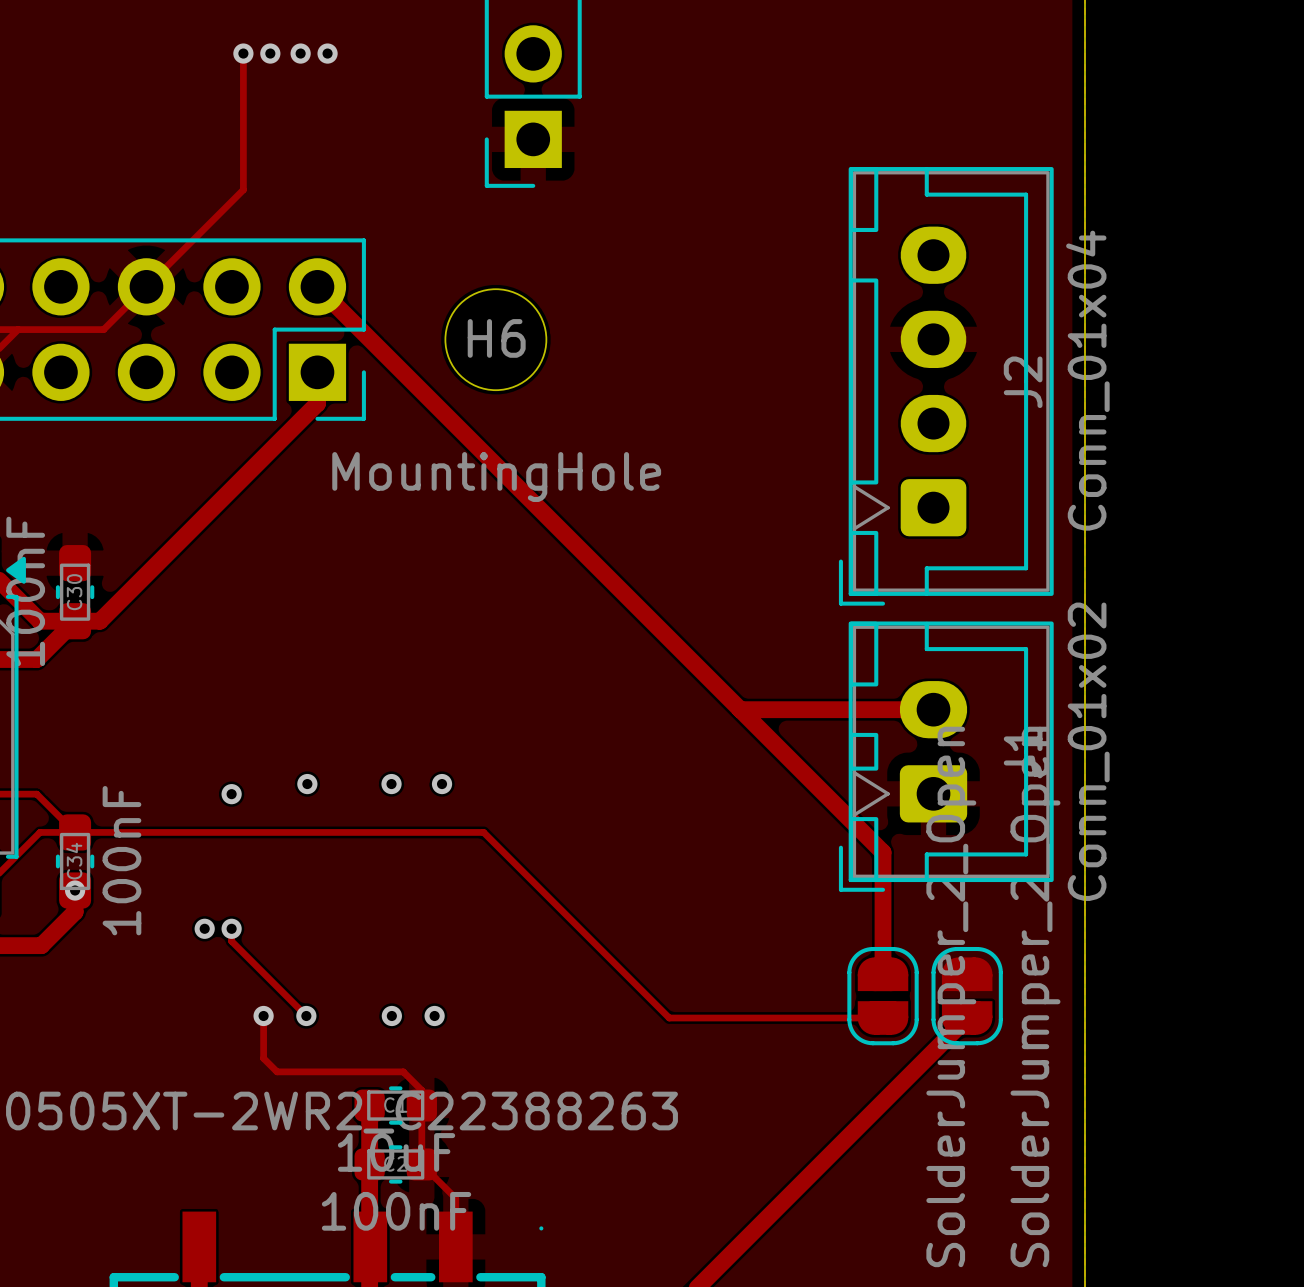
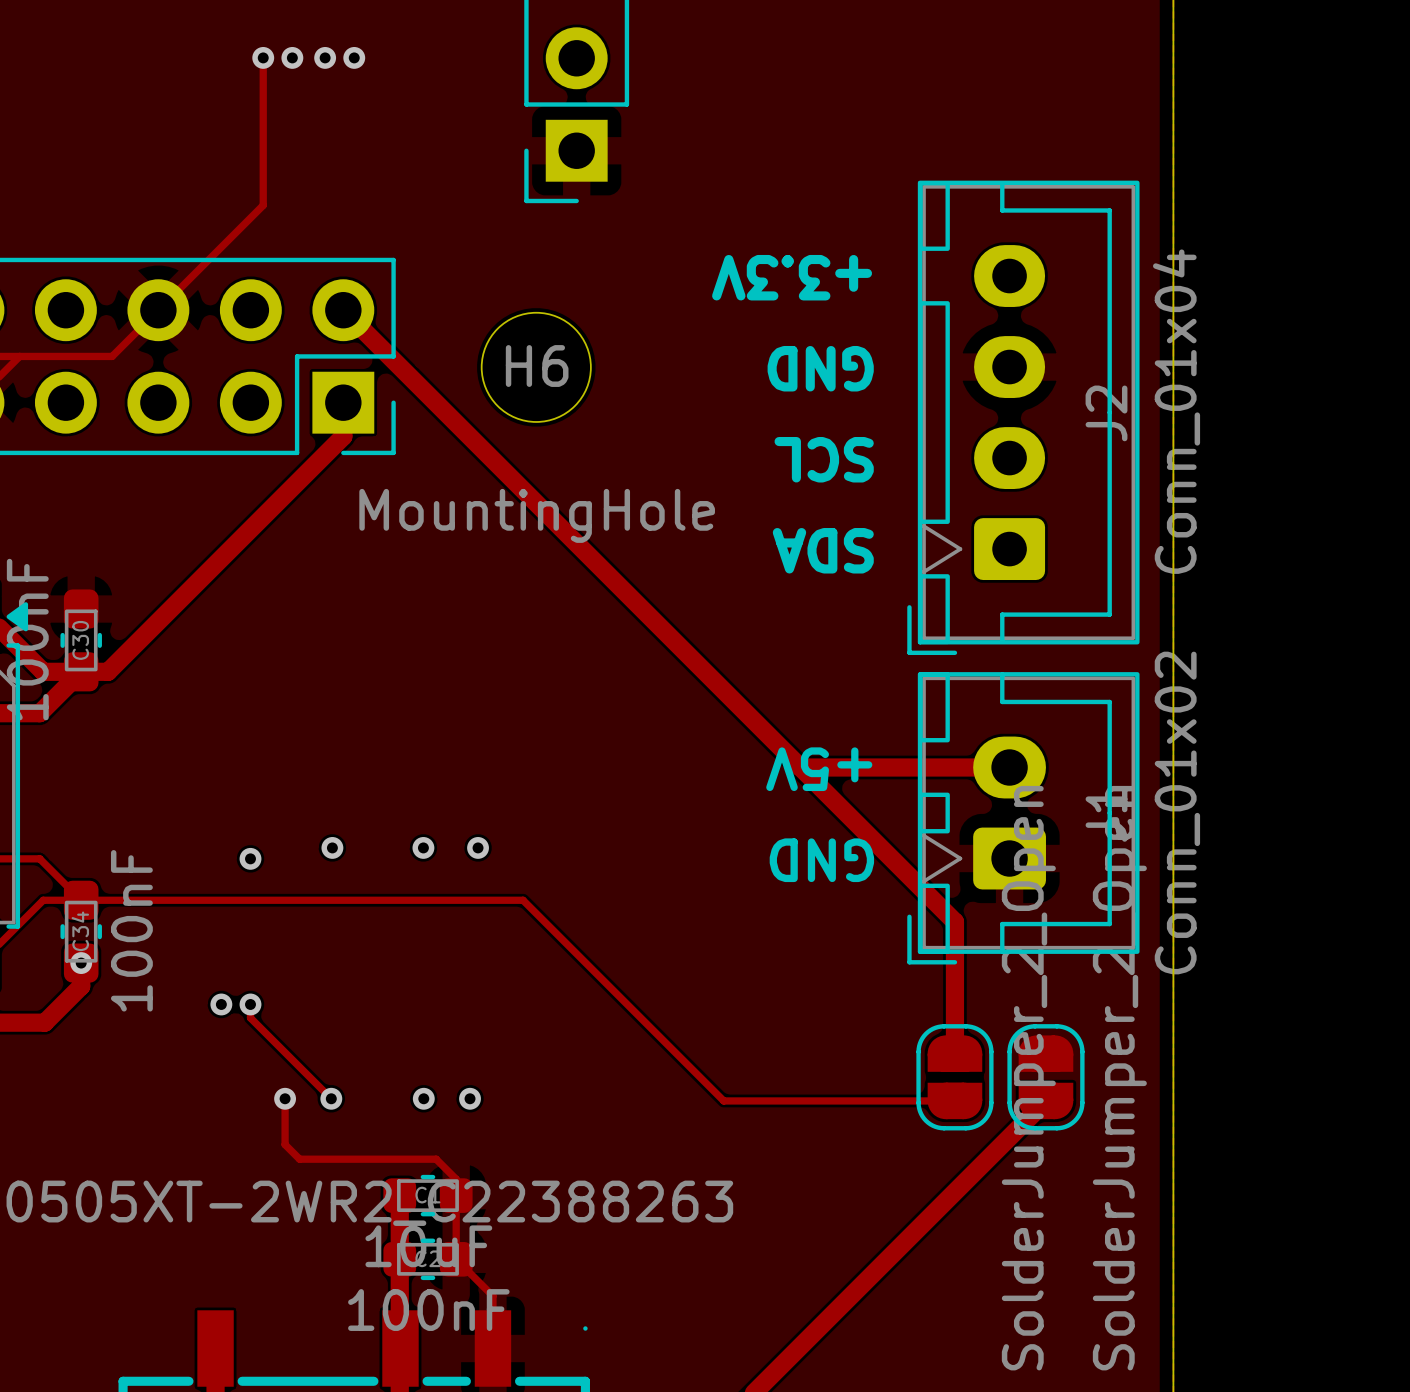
text: none -> +3.3V (792, 277)
text: none -> GND (820, 368)
text: none -> SCL (824, 459)
text: none -> SDA (823, 550)
text: none -> +5V (819, 769)
text: none -> GND (821, 860)

